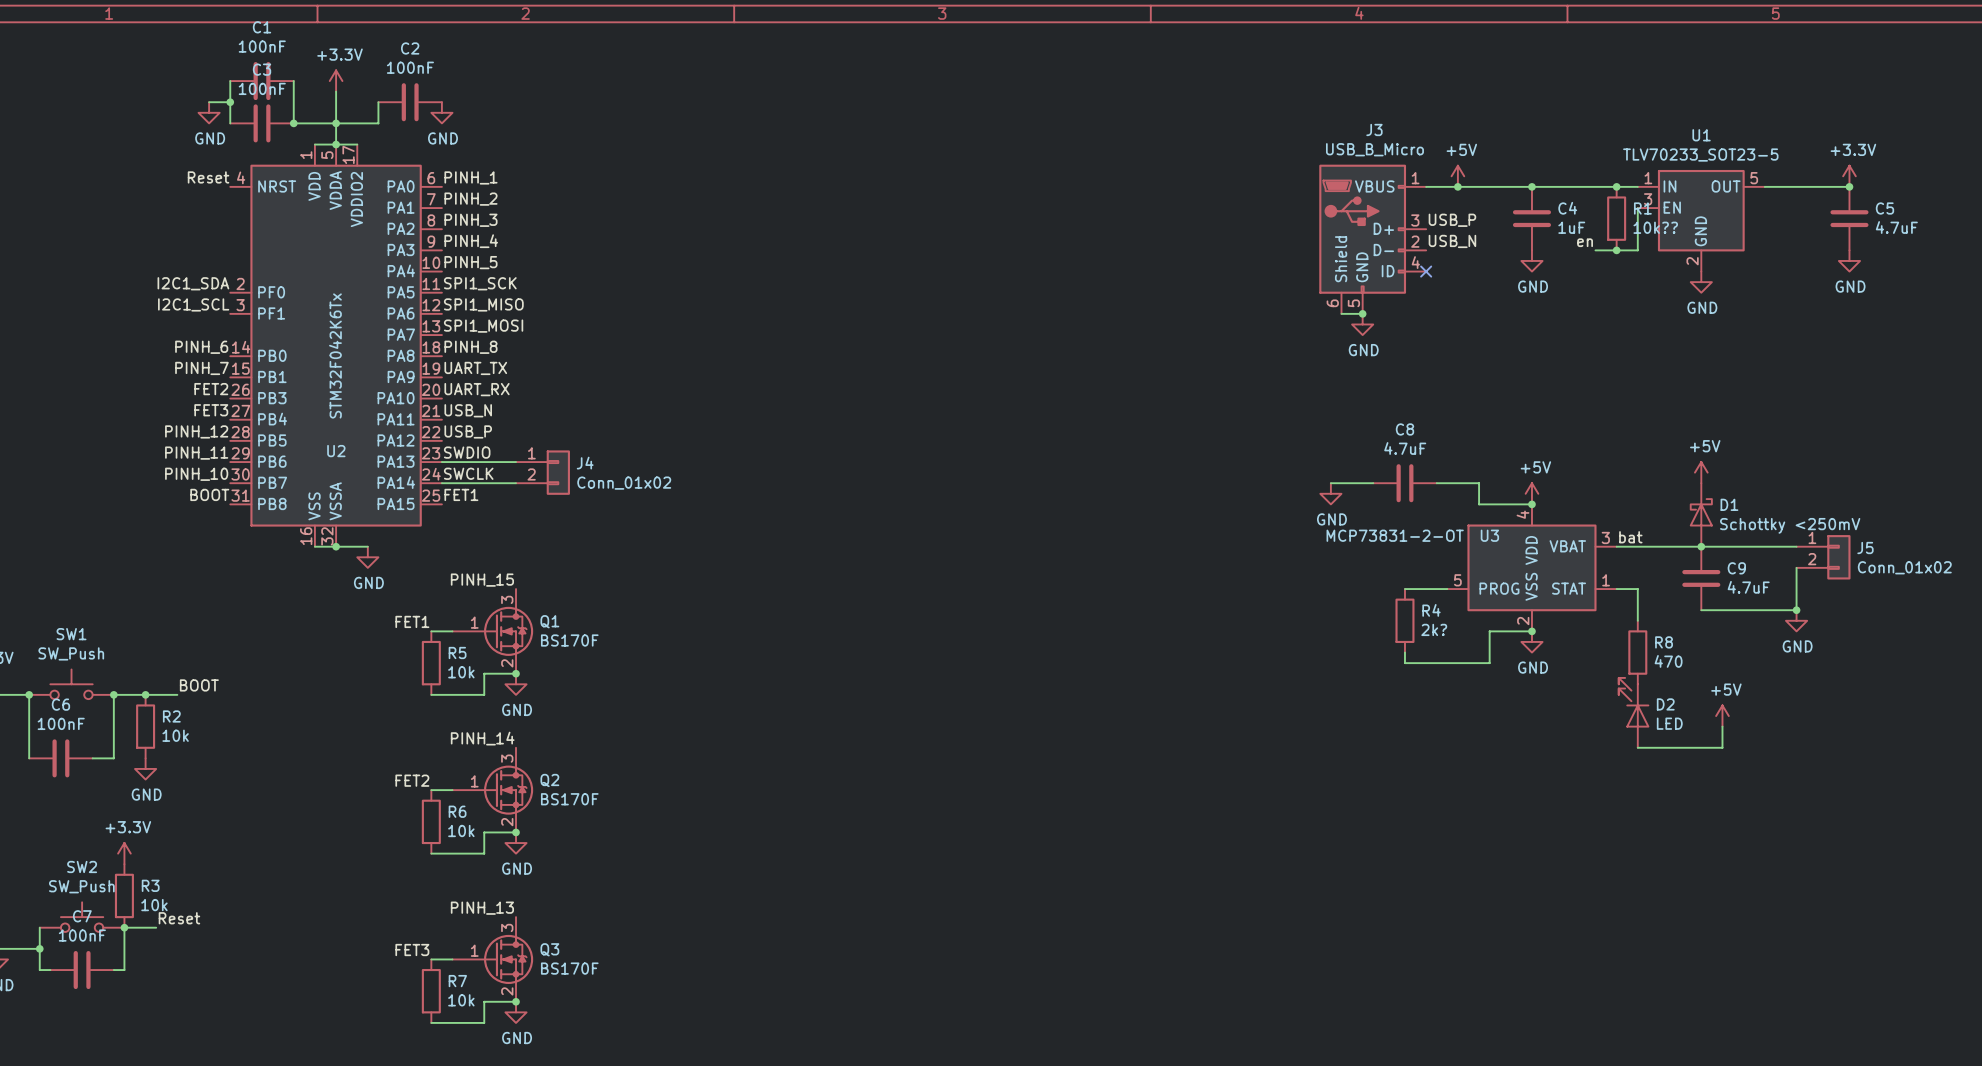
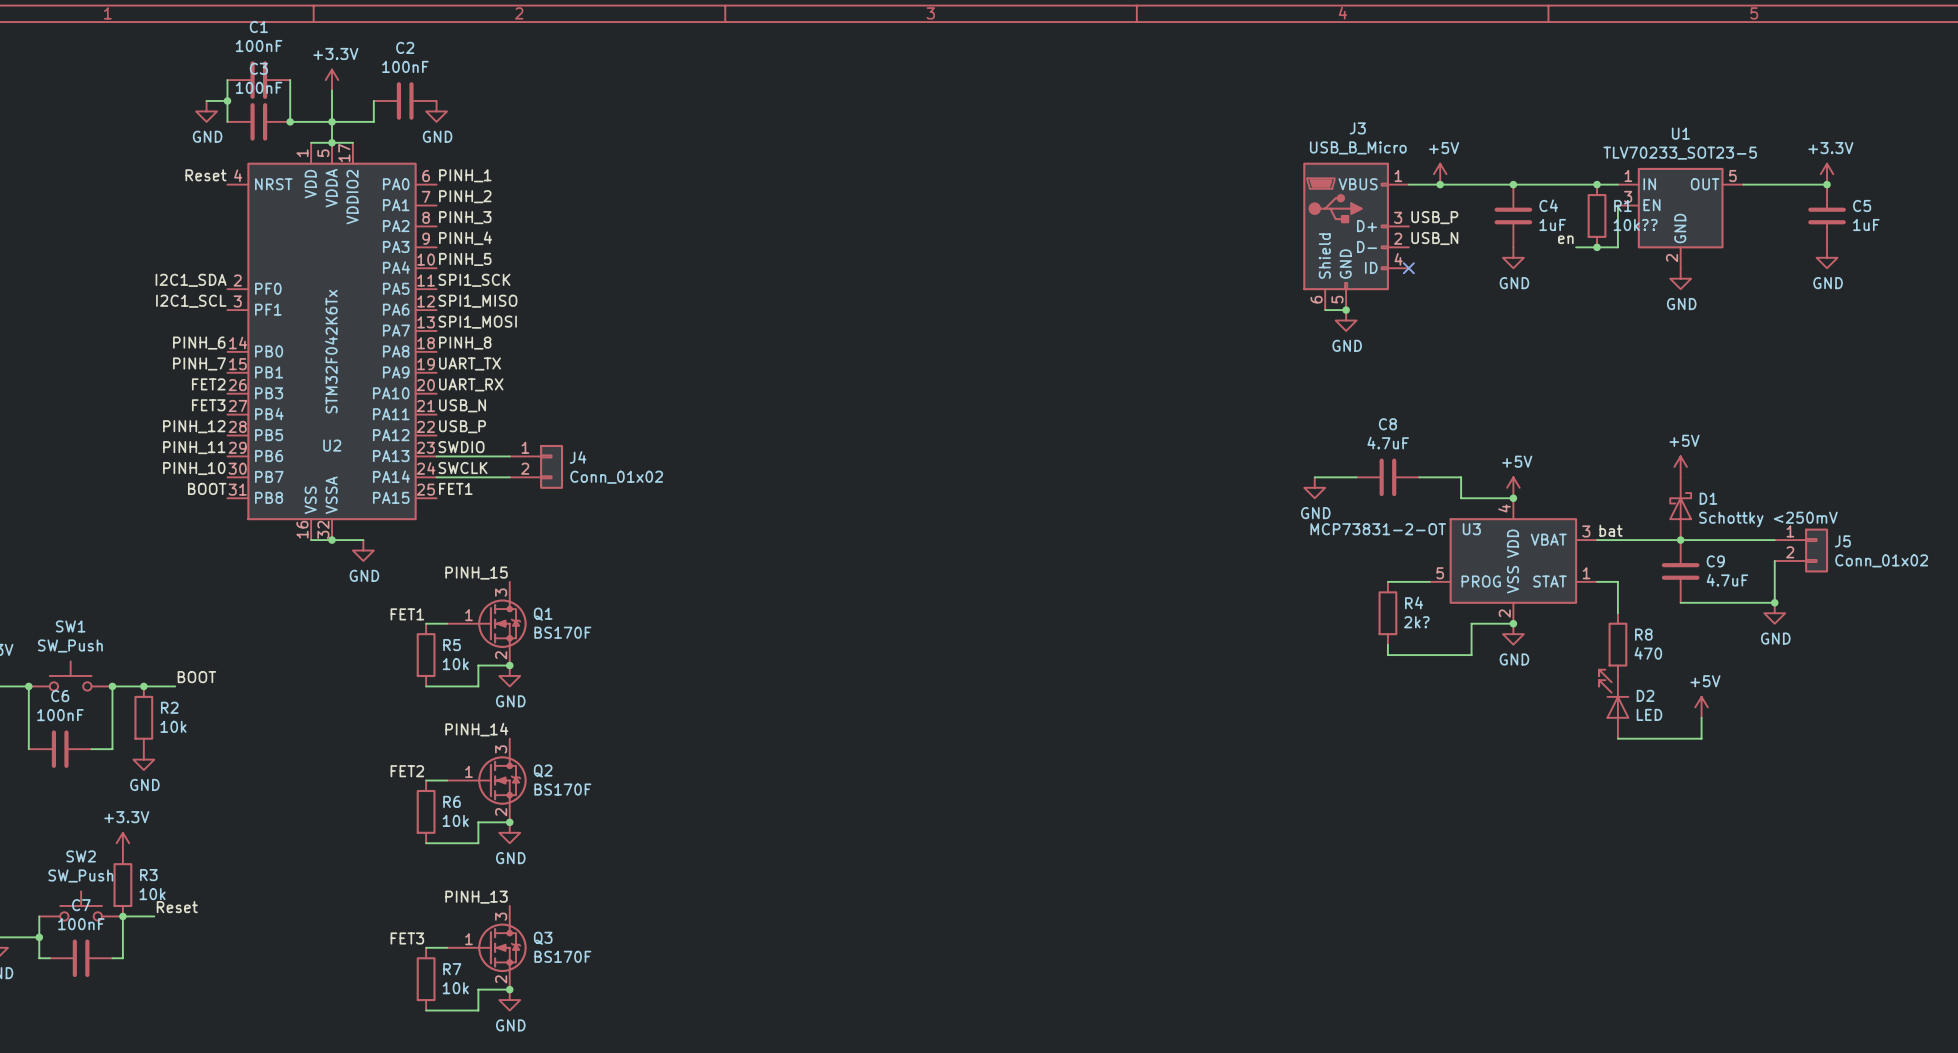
C5 value: 4.7uF (1896, 227) -> 1uF (1866, 225)

